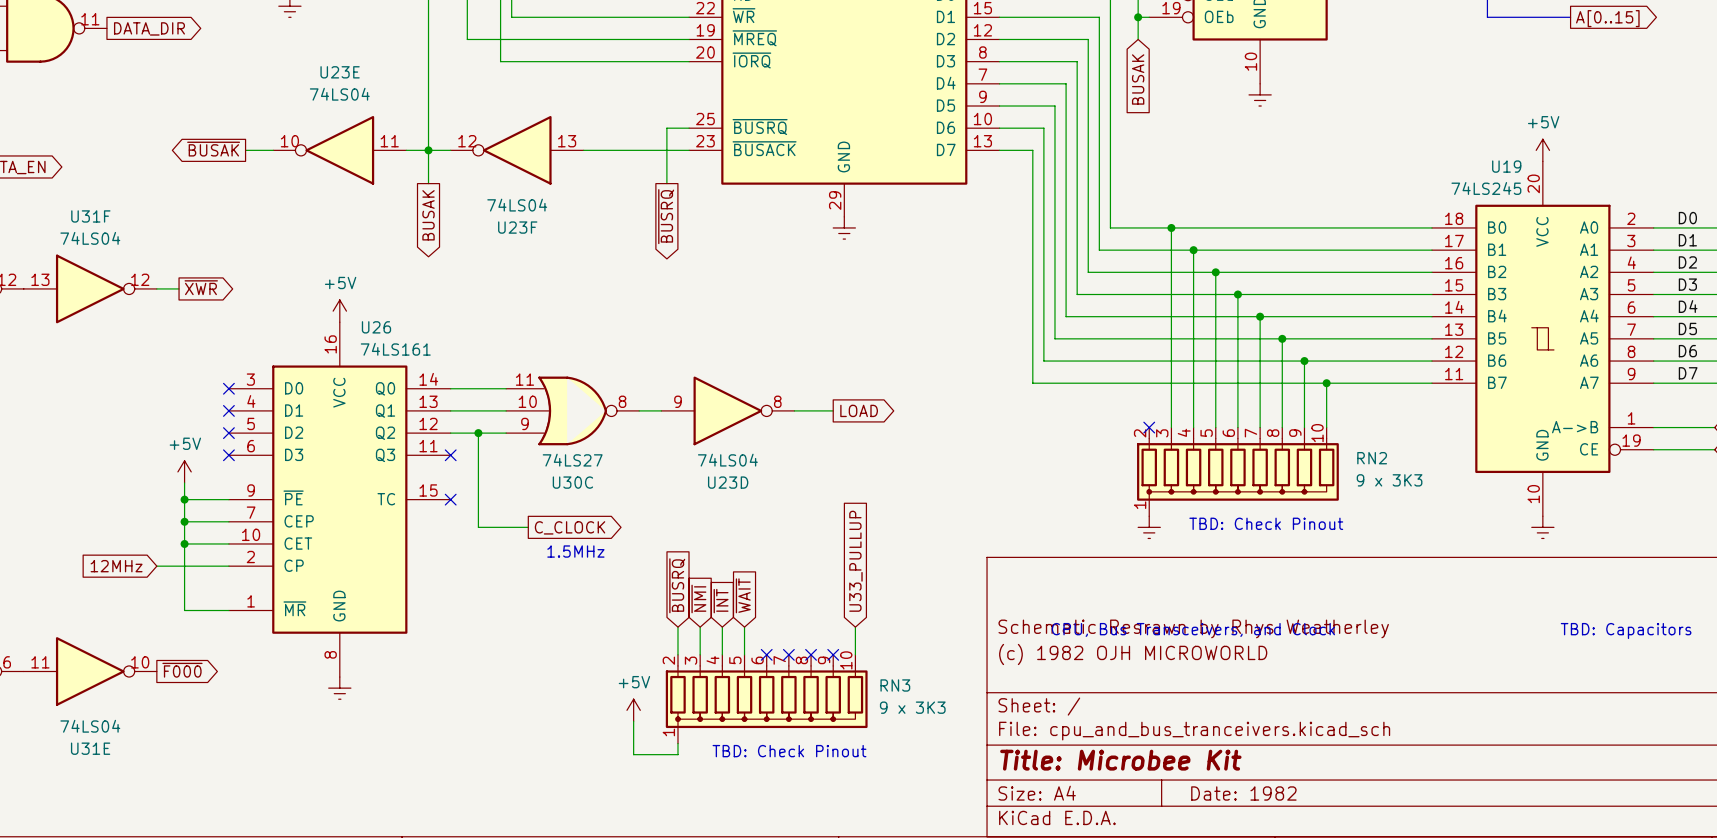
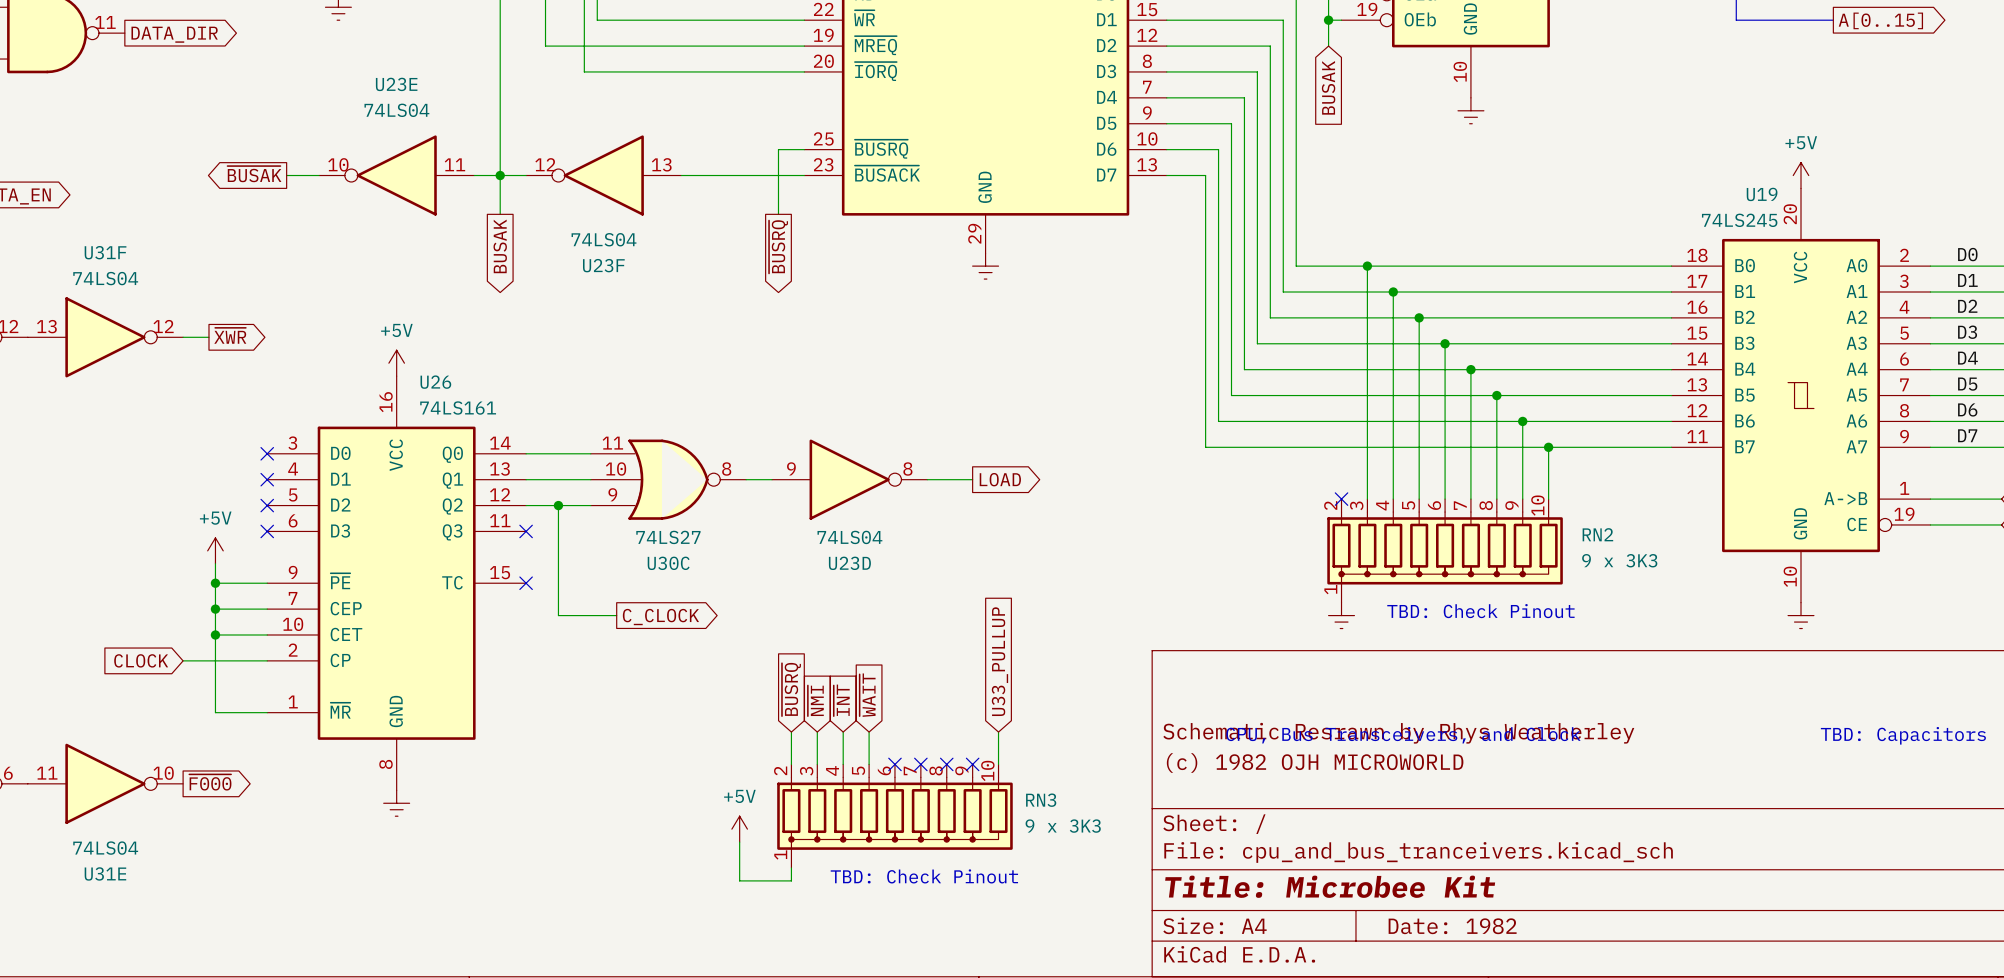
text: 1.5MHz (575, 551) -> none
global label: 12MHz (116, 566) -> CLOCK (141, 660)

